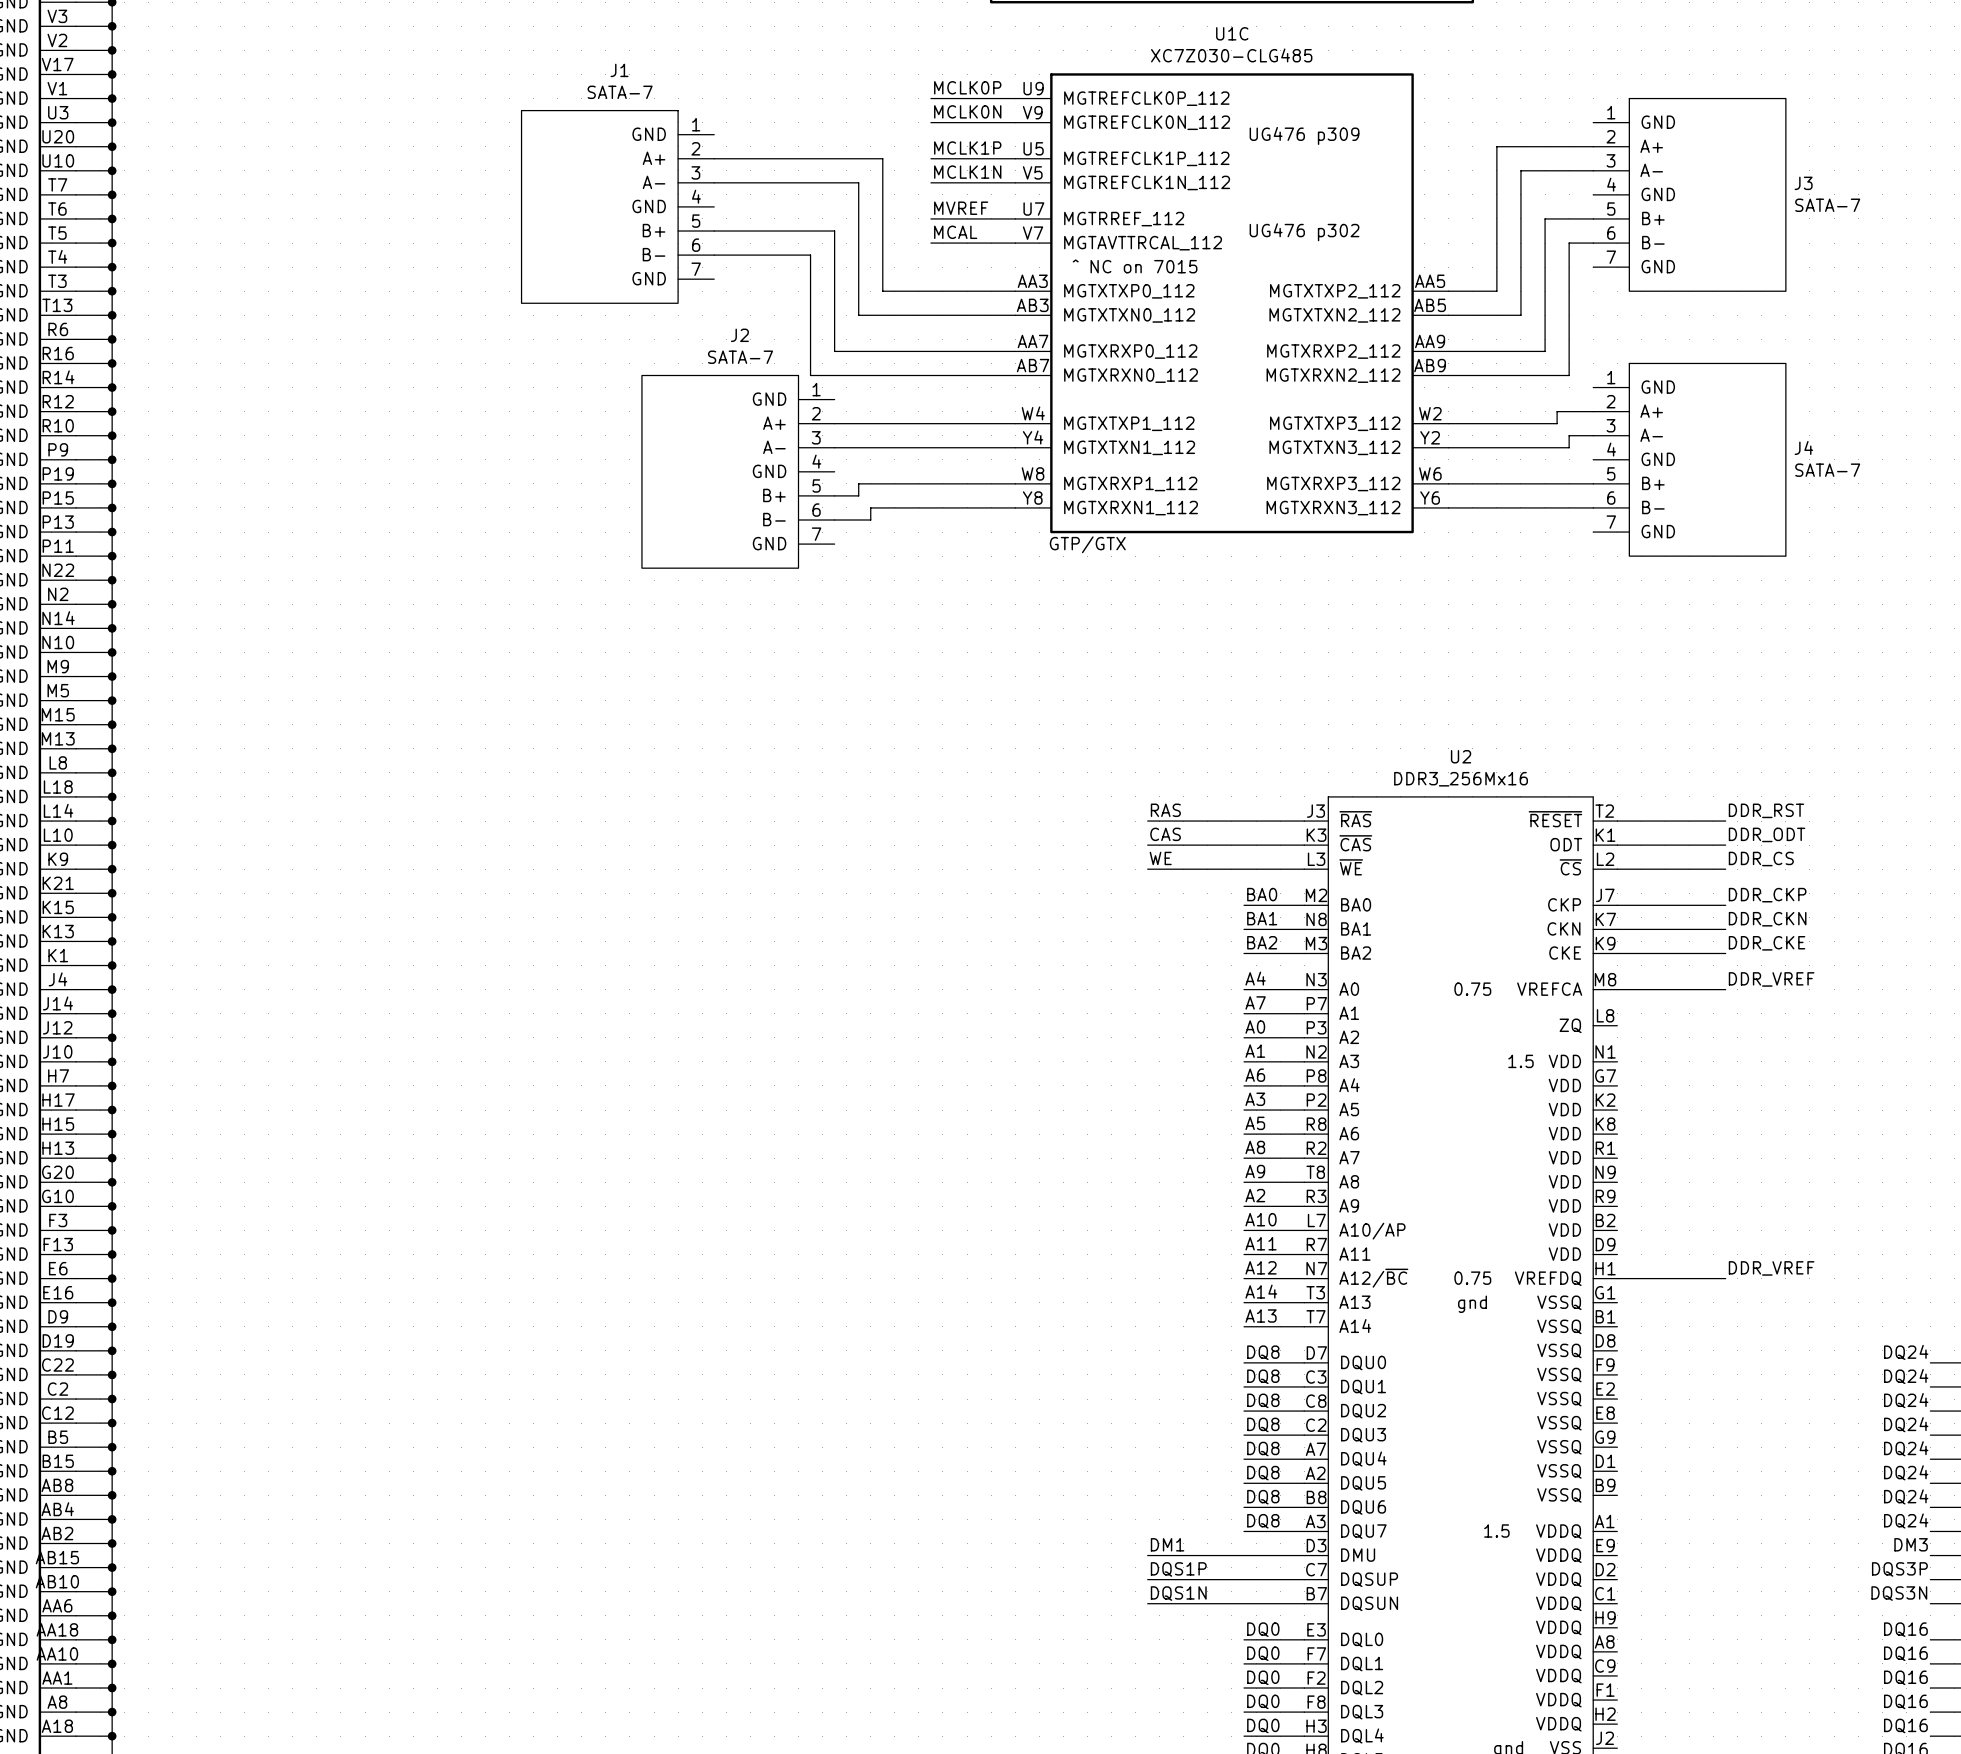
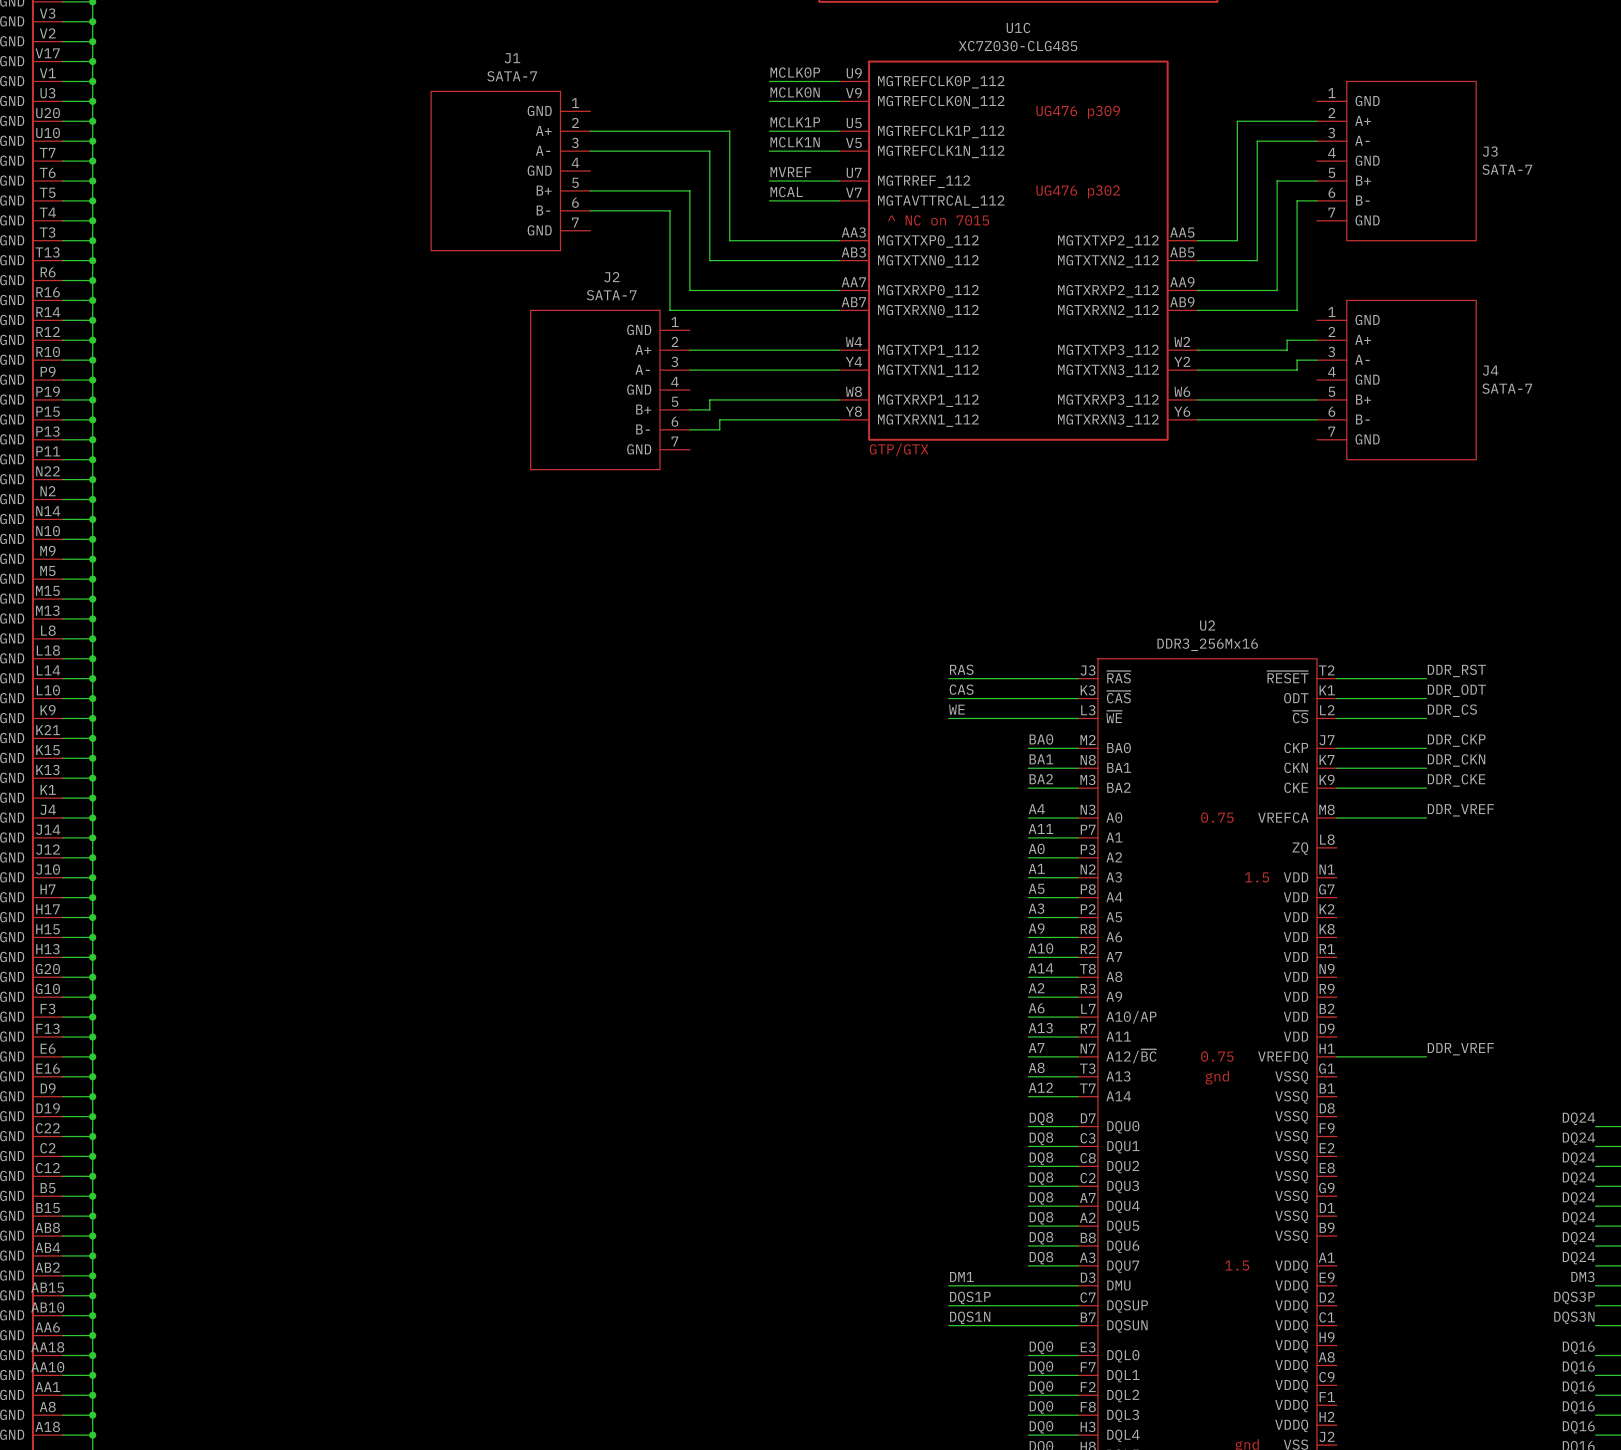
label: A7 (1255, 1002) -> A11 (1041, 829)
label: A6 (1255, 1075) -> A5 (1036, 888)
label: A5 (1255, 1123) -> A9 (1036, 928)
label: A8 (1255, 1147) -> A10 (1040, 948)
label: A9 (1255, 1171) -> A14 (1041, 968)
label: A10 (1261, 1219) -> A6 (1036, 1008)
label: A11 (1261, 1243) -> A13 (1040, 1028)
label: A12 (1261, 1267) -> A7 (1036, 1048)
label: A14 (1261, 1291) -> A8 (1036, 1067)
label: A13 (1261, 1316) -> A12 (1040, 1087)

